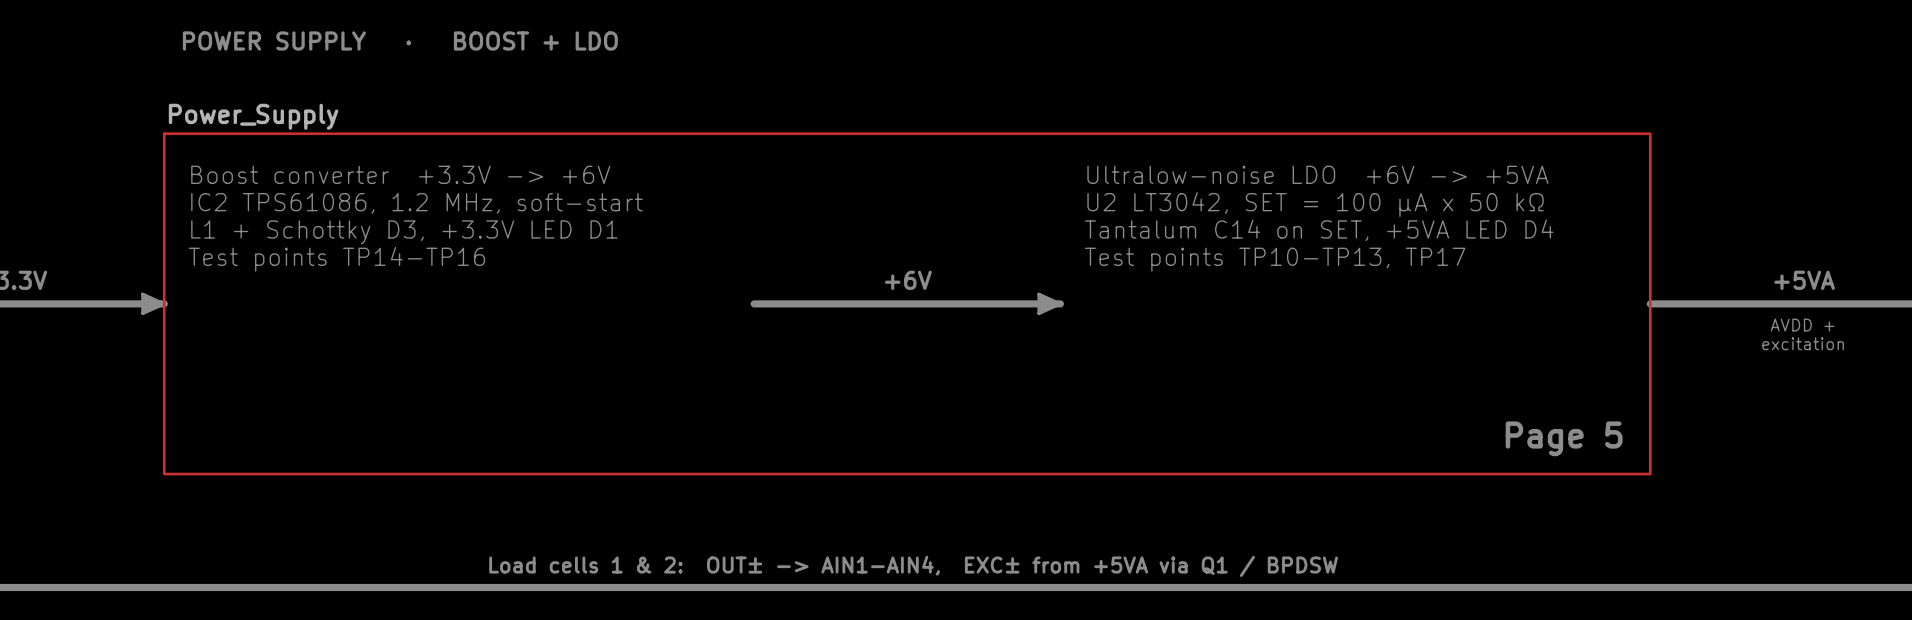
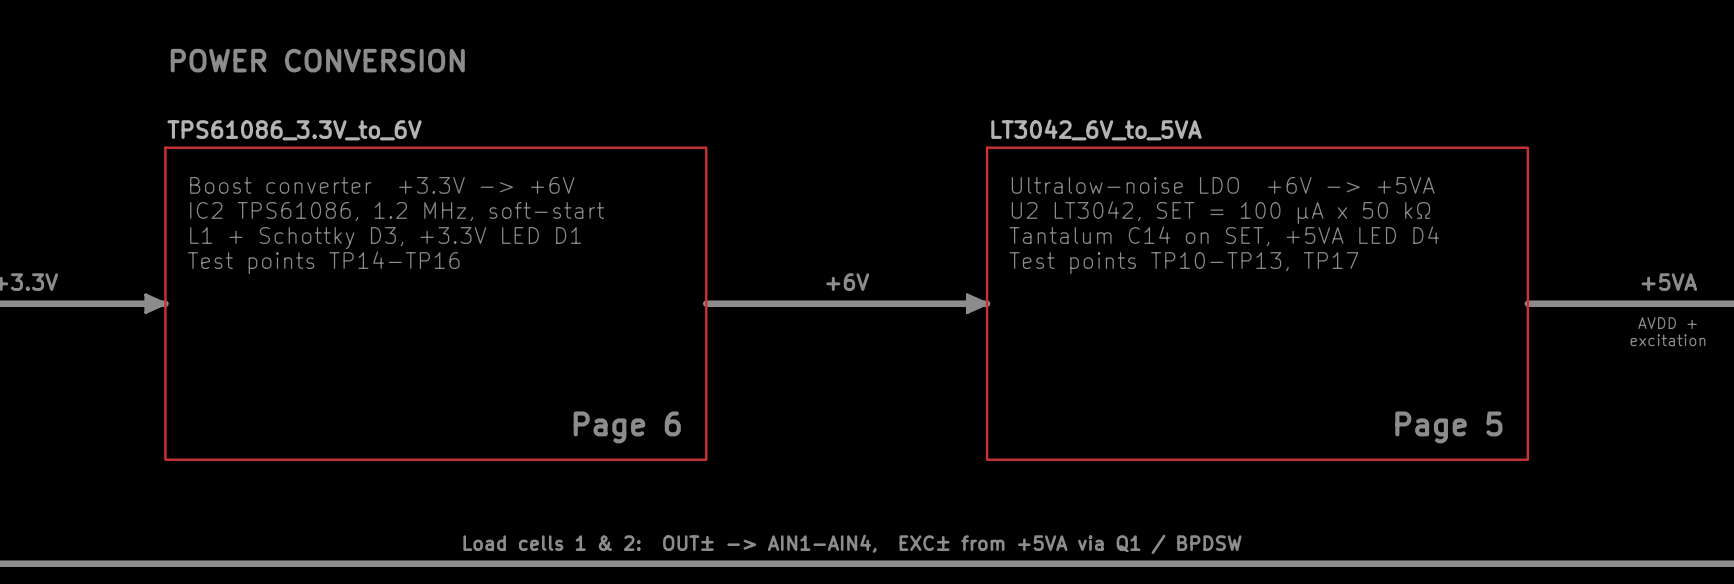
text: none -> POWER CONVERSION (317, 60)
text: POWER SUPPLY · BOOST + LDO (400, 40) -> none
sheet TPS61086_3.3V_to_6V: none -> (435, 303)
sheet Power_Supply: (907, 303) -> none
sheet LT3042_6V_to_5VA: none -> (1257, 303)
text: none -> Page 6 (627, 427)

